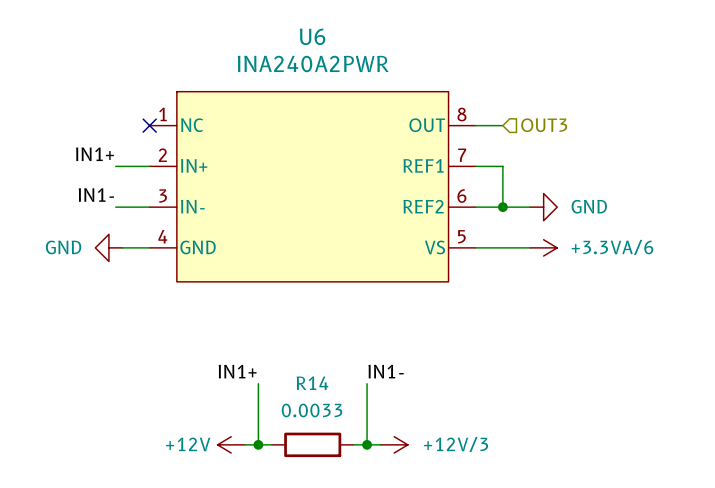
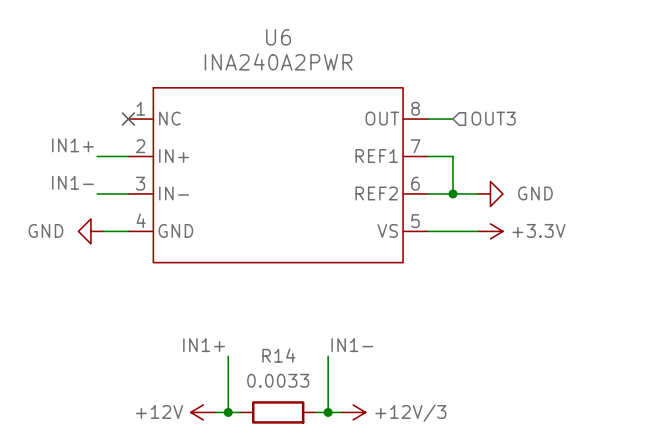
power symbol: +3.3VA/6 (543, 247) -> +3.3V (490, 231)

